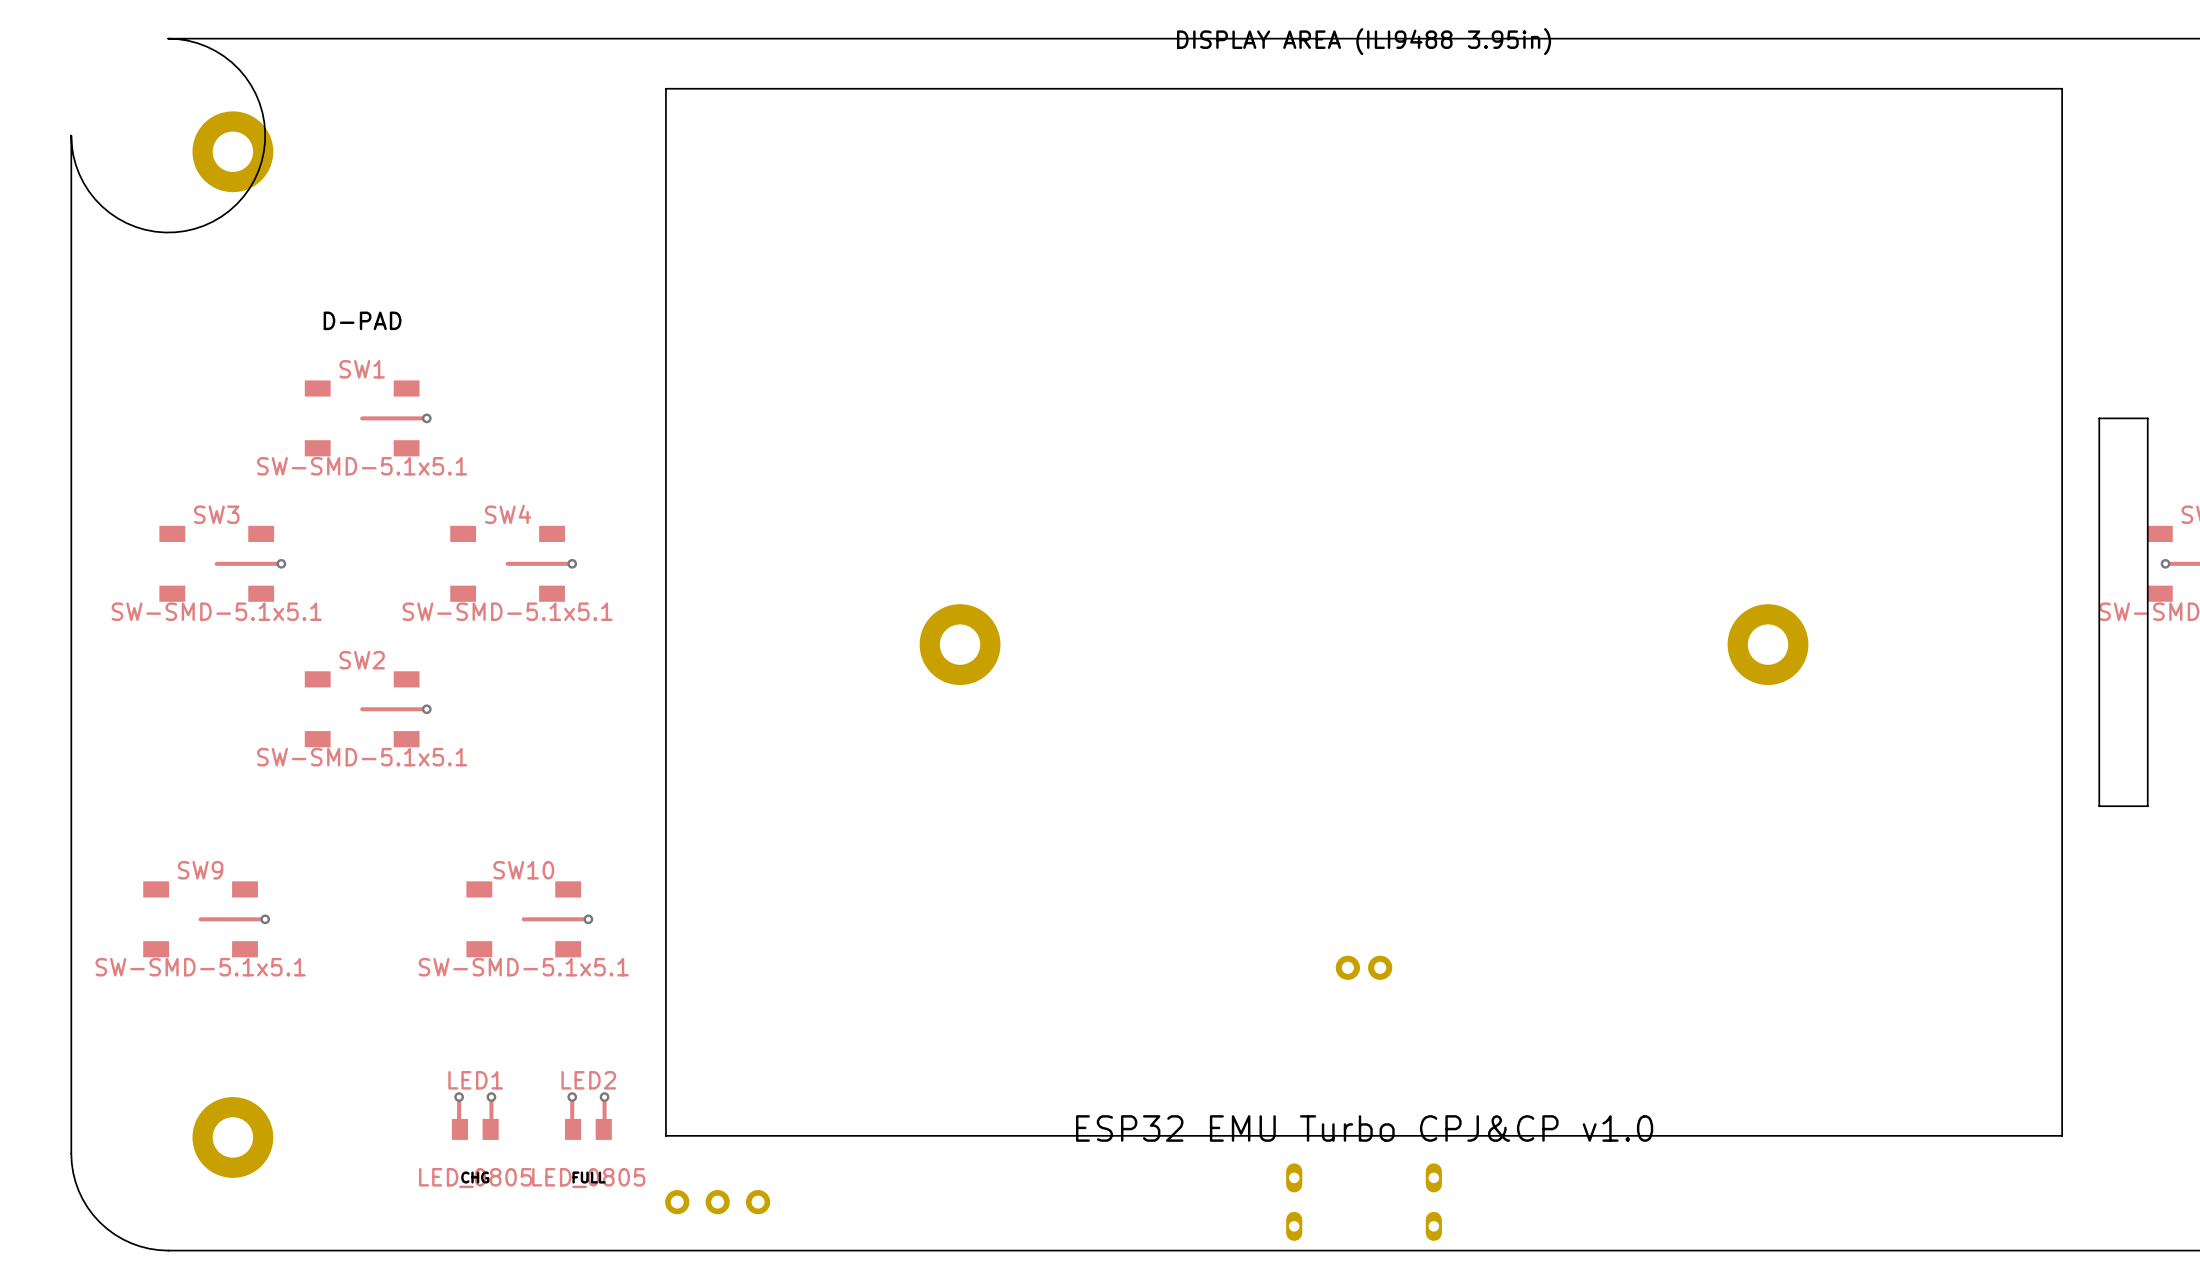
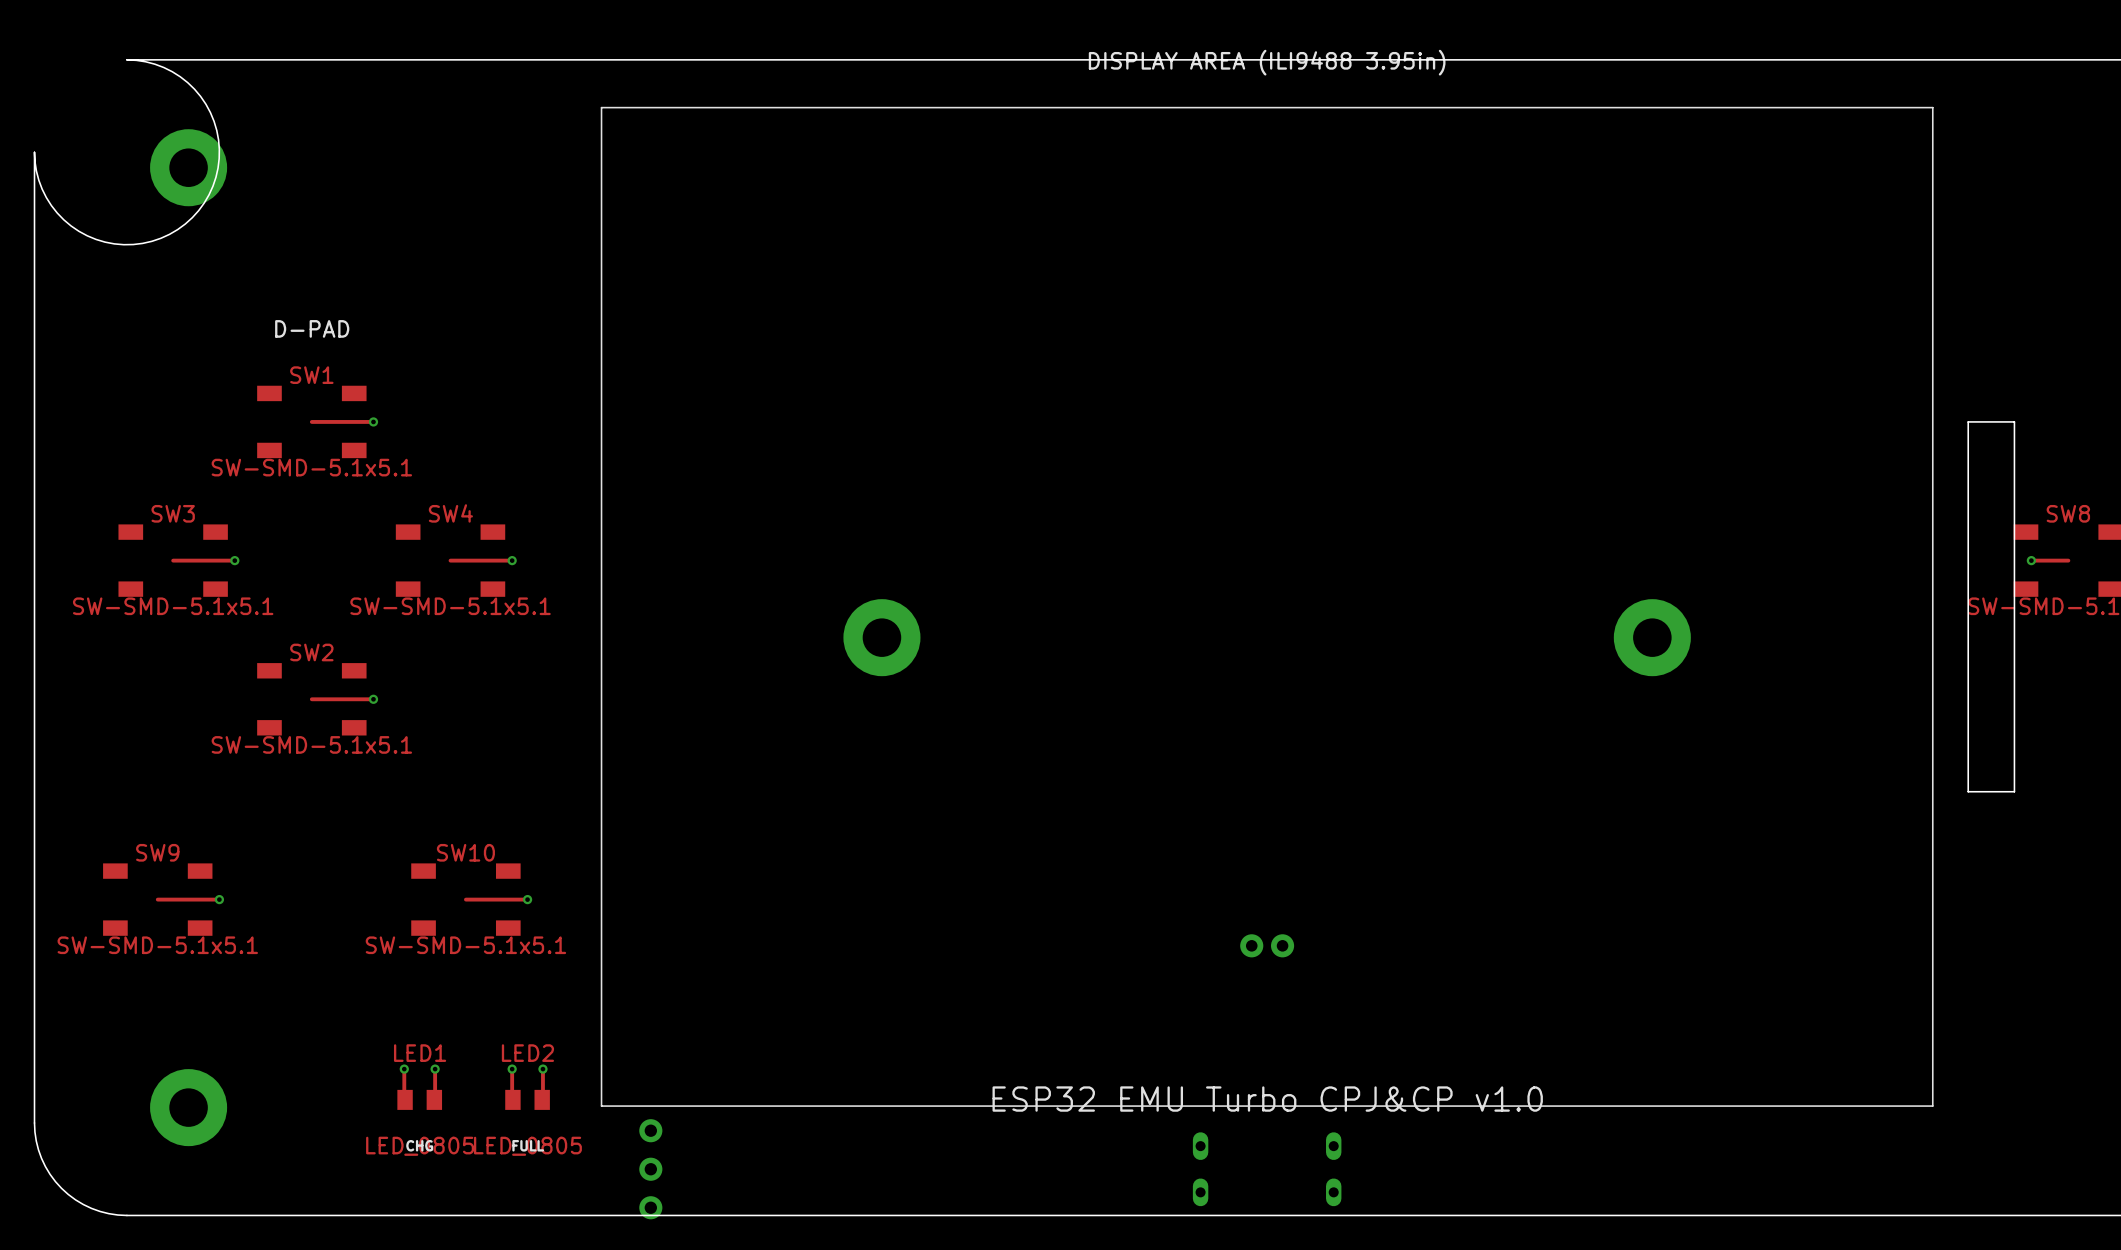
part rotation: 0° (717, 1202) -> 90° clockwise (650, 1169)

